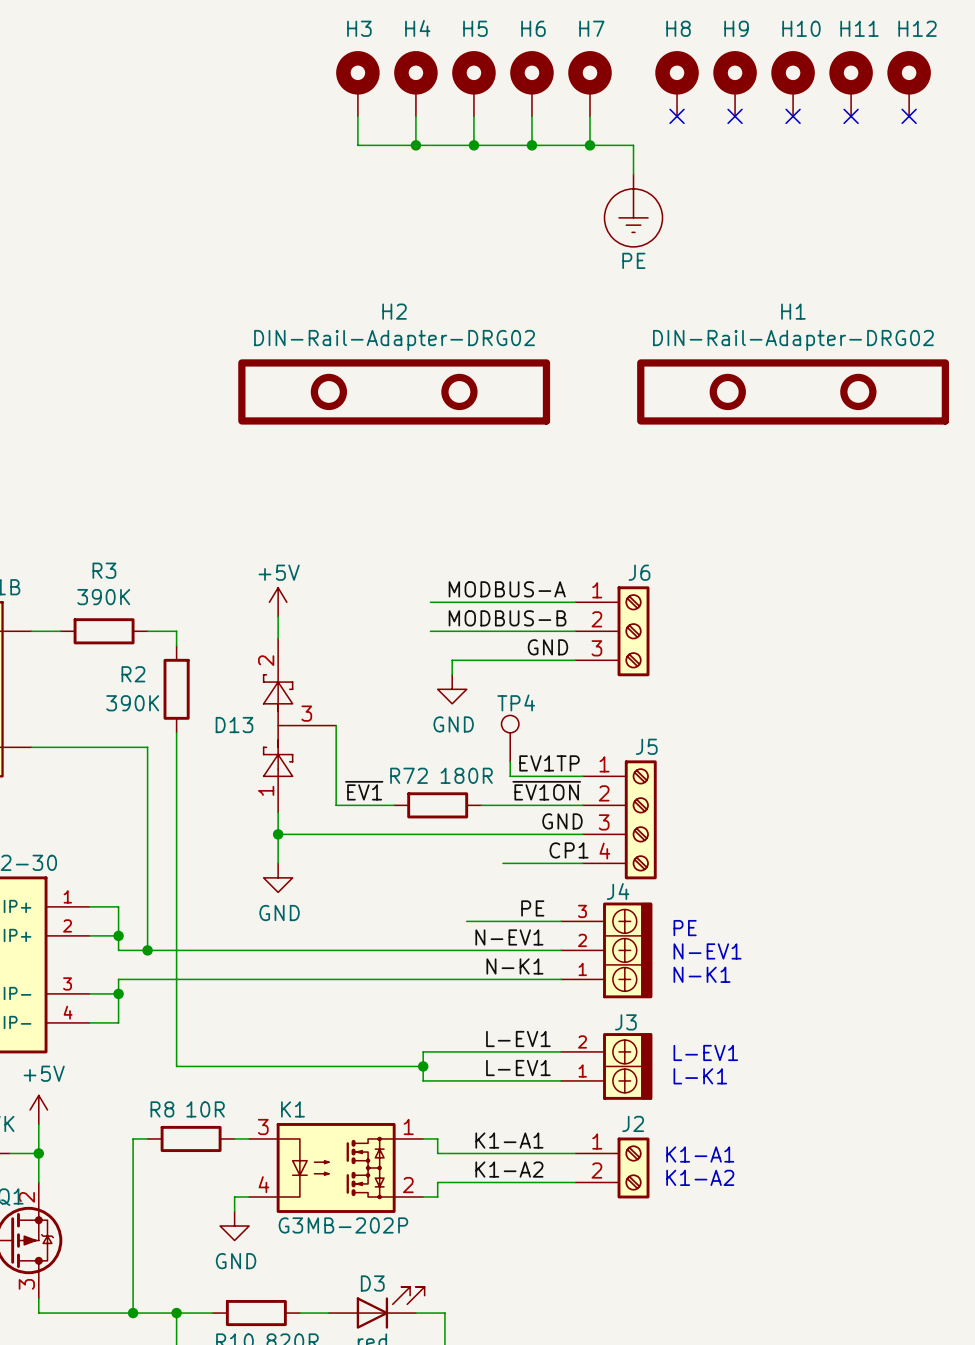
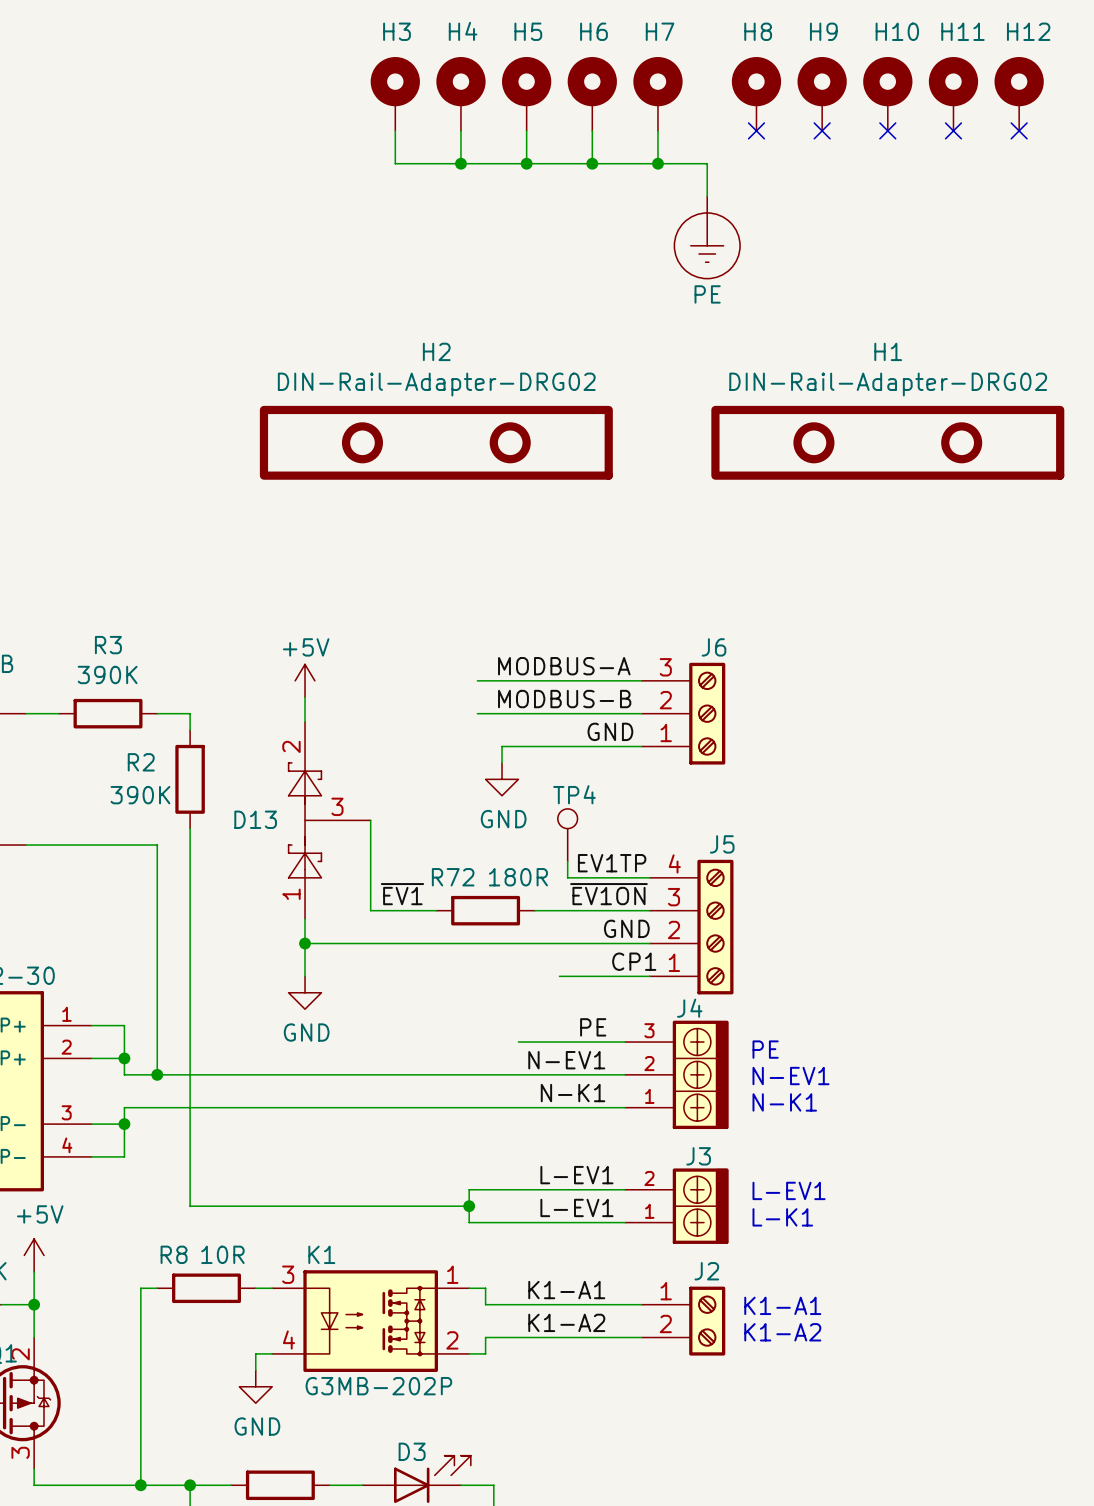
J6 flip: as is (633, 631) -> up-down (707, 713)
J5 flip: as is (640, 819) -> up-down (715, 927)

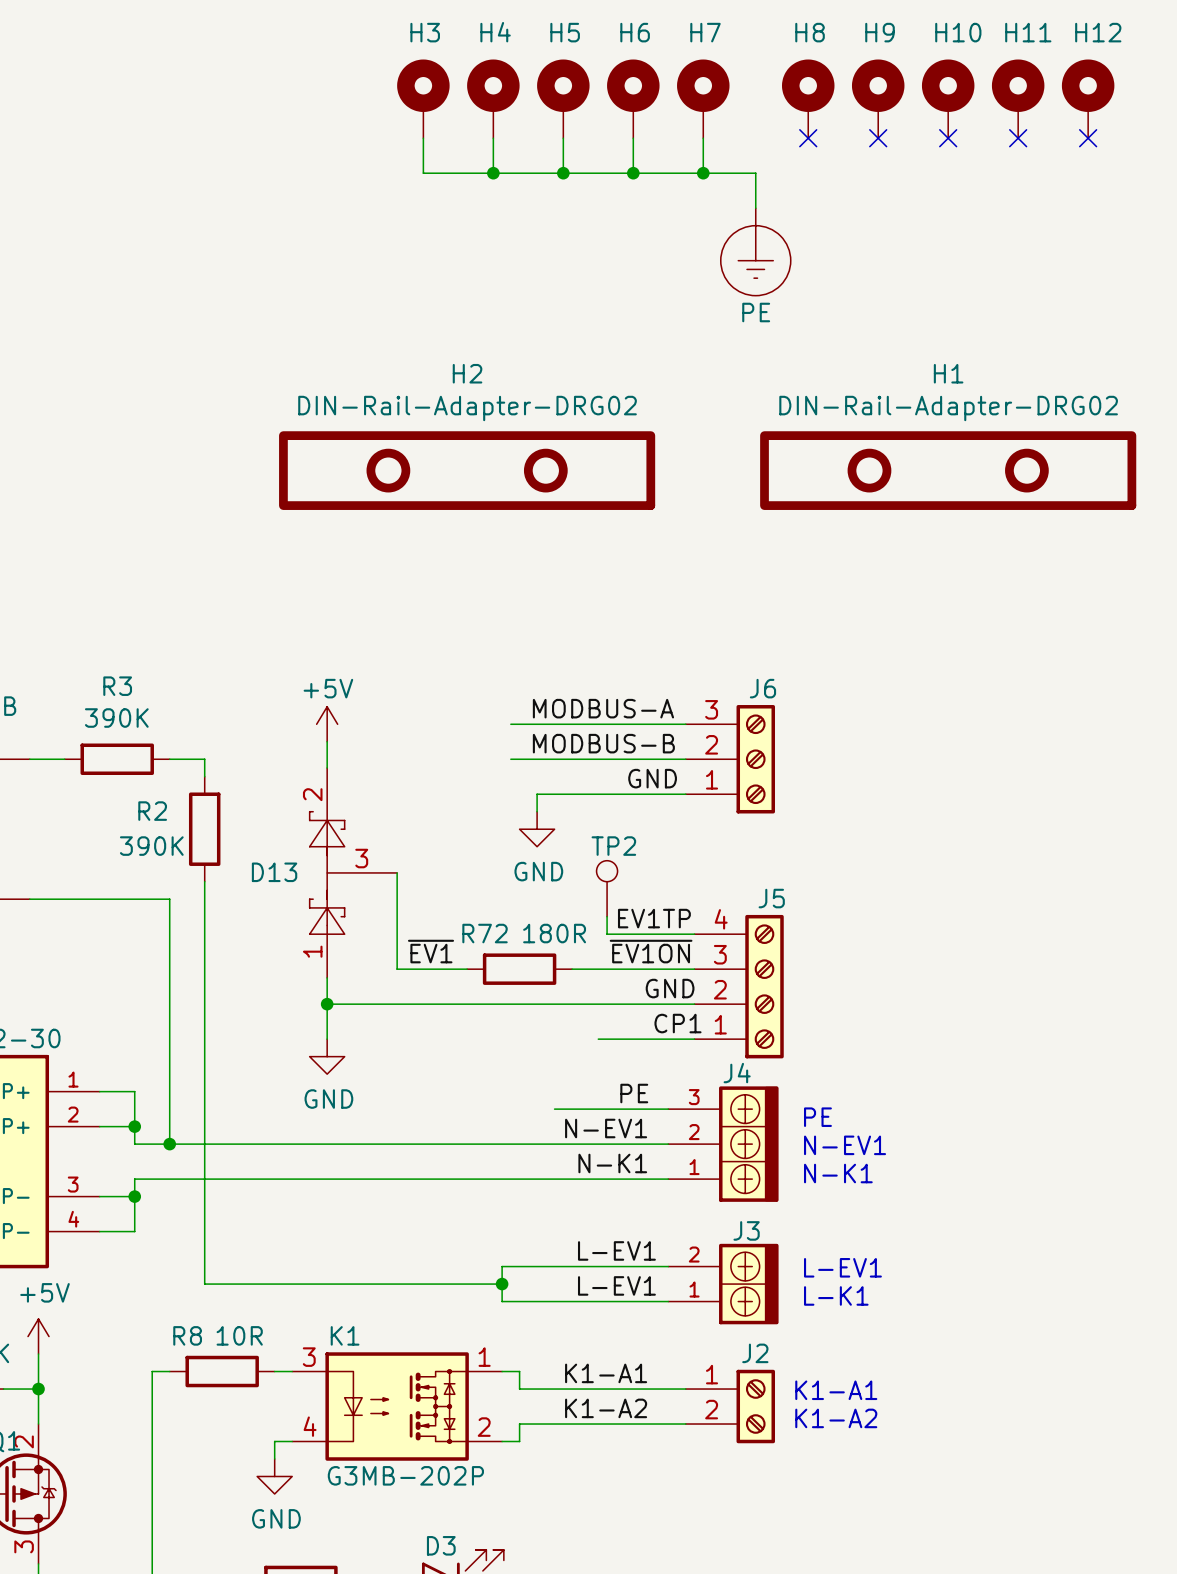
TP4 name: TP4 (574, 794) -> TP2 (613, 846)

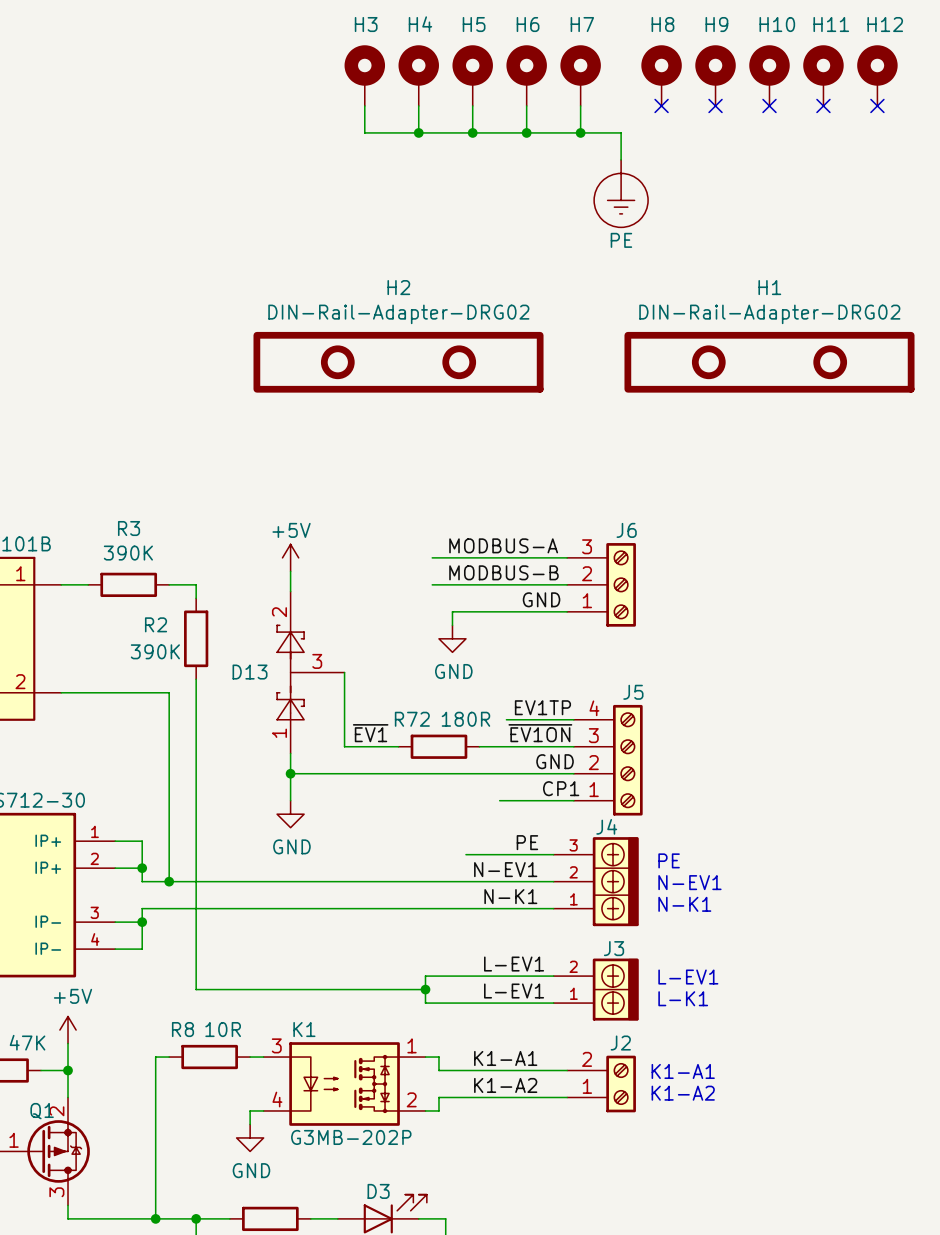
TP2: (607, 888) -> none
wire: (607, 916) (607, 934) -> none
J2 flip: as is (755, 1406) -> up-down (621, 1084)

